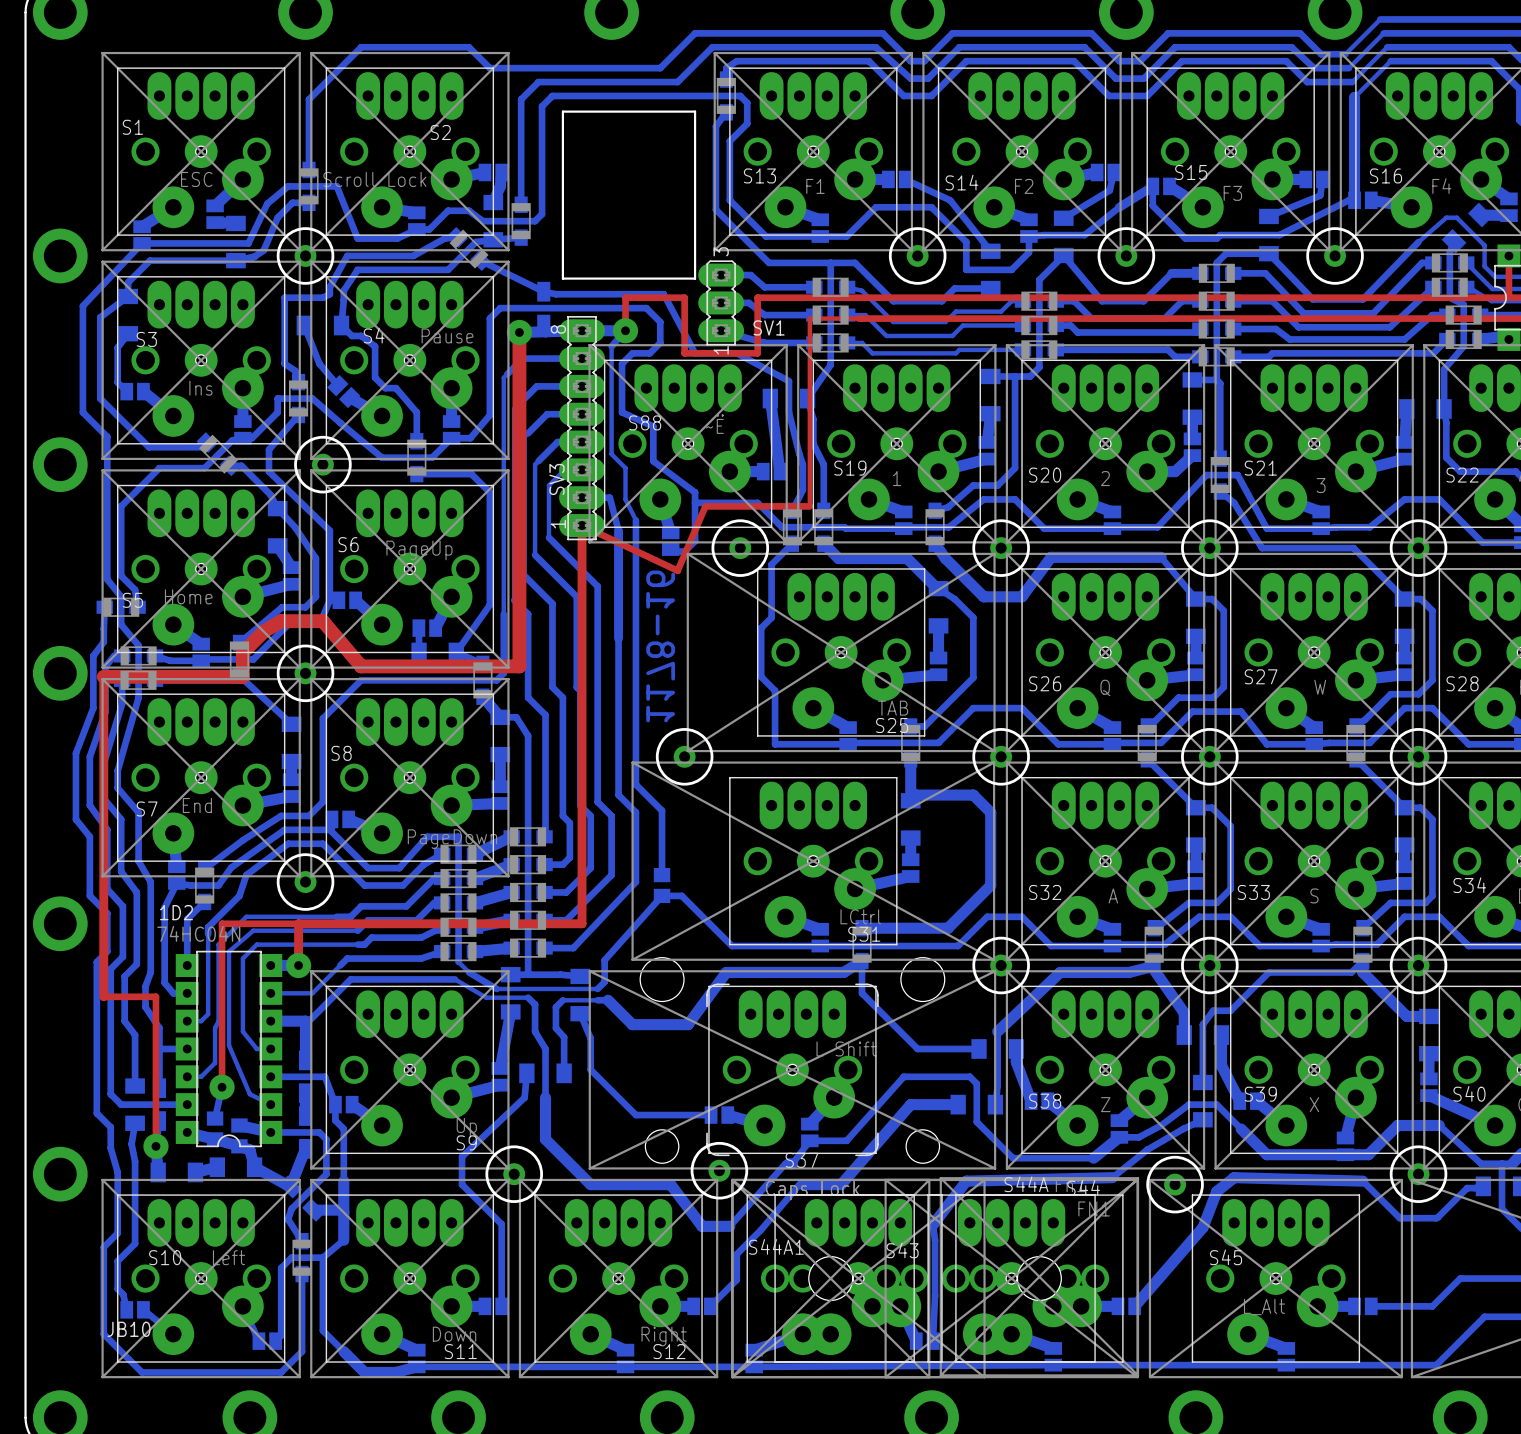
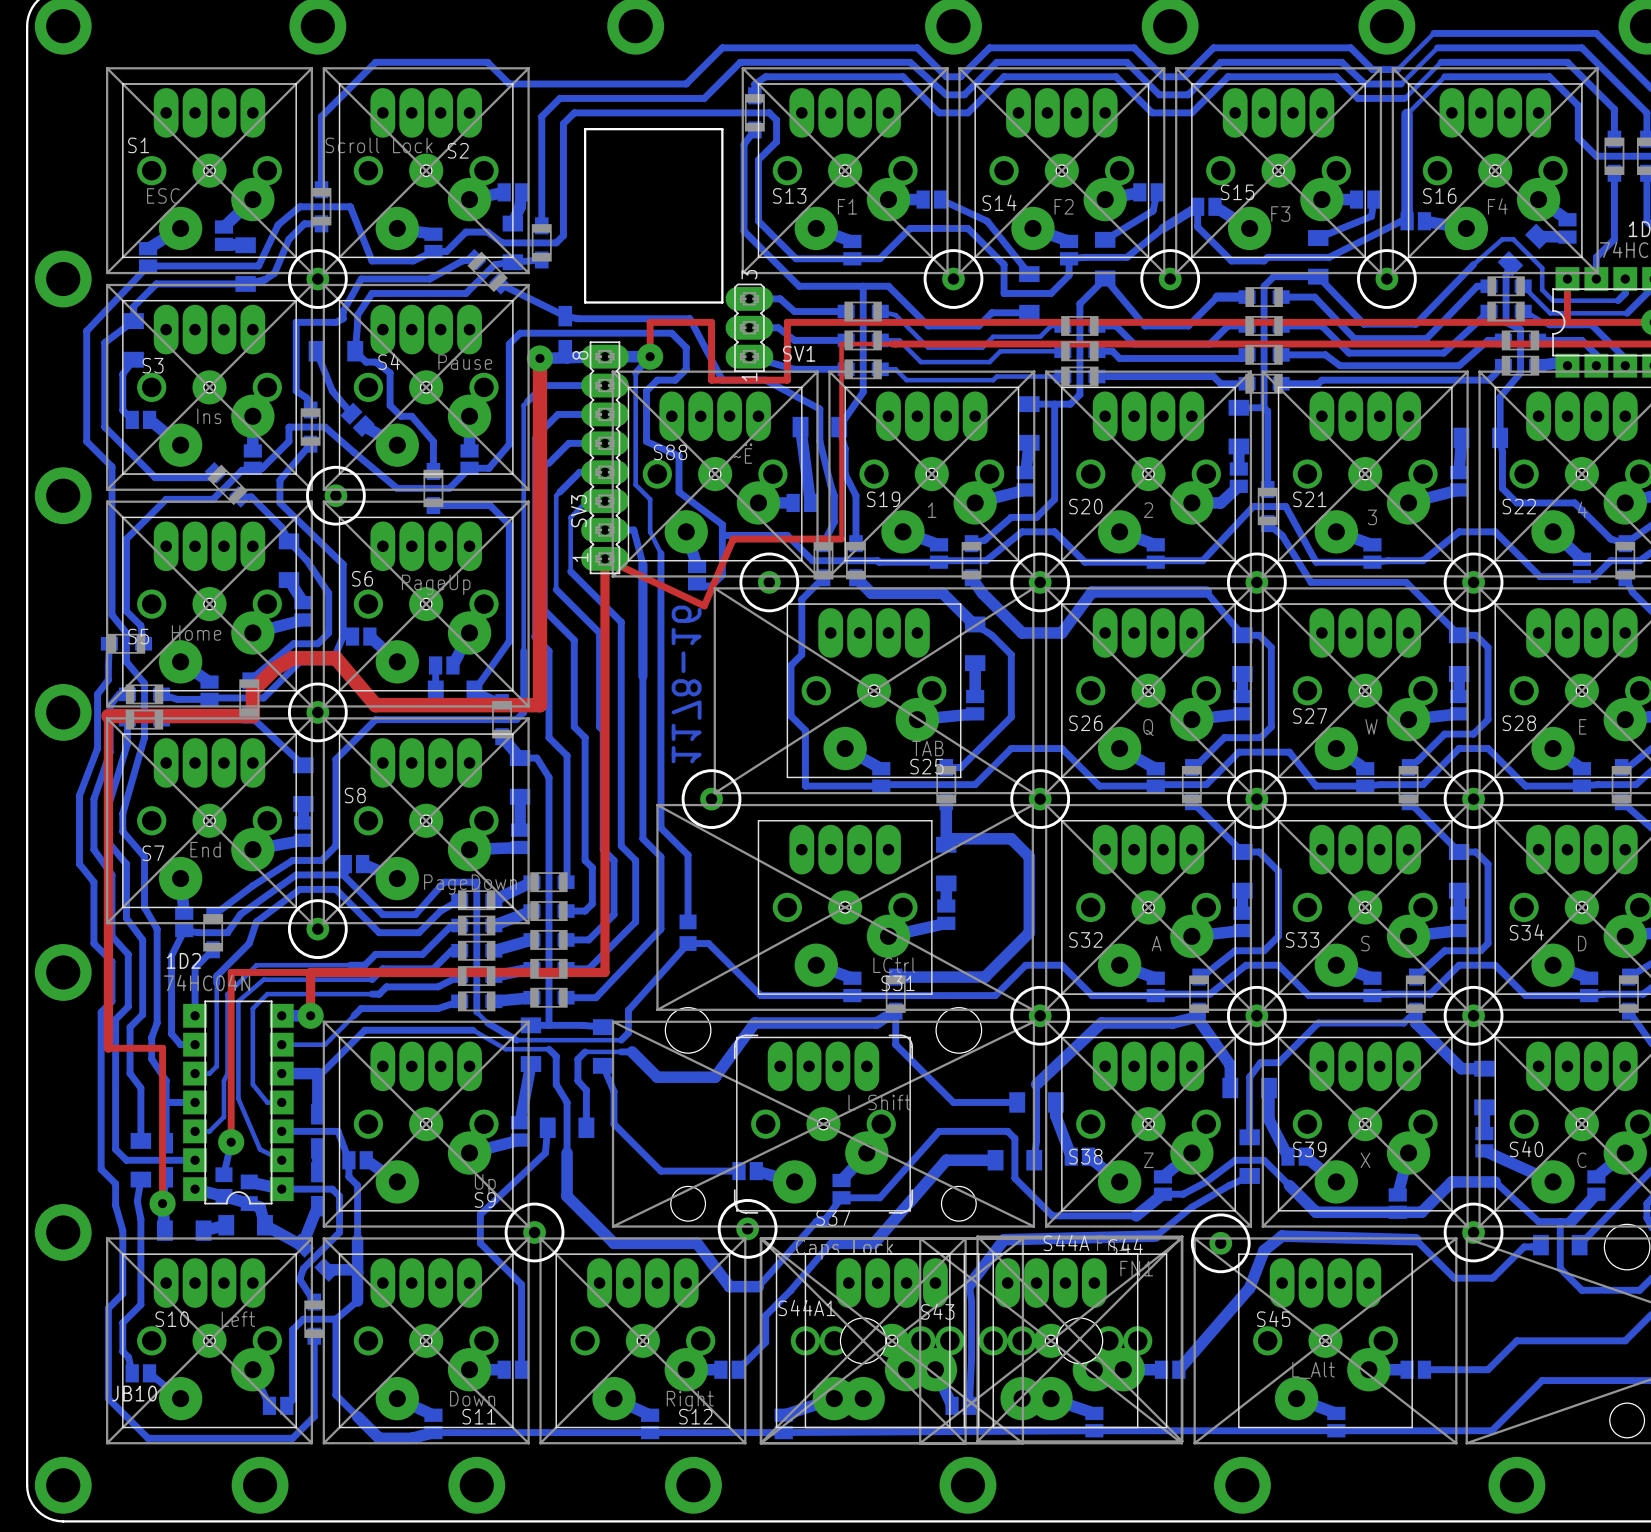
S1 value position: ESC (196, 179) -> ESC (163, 195)
S2 value position: Scroll Lock (374, 179) -> Scroll Lock (379, 145)

